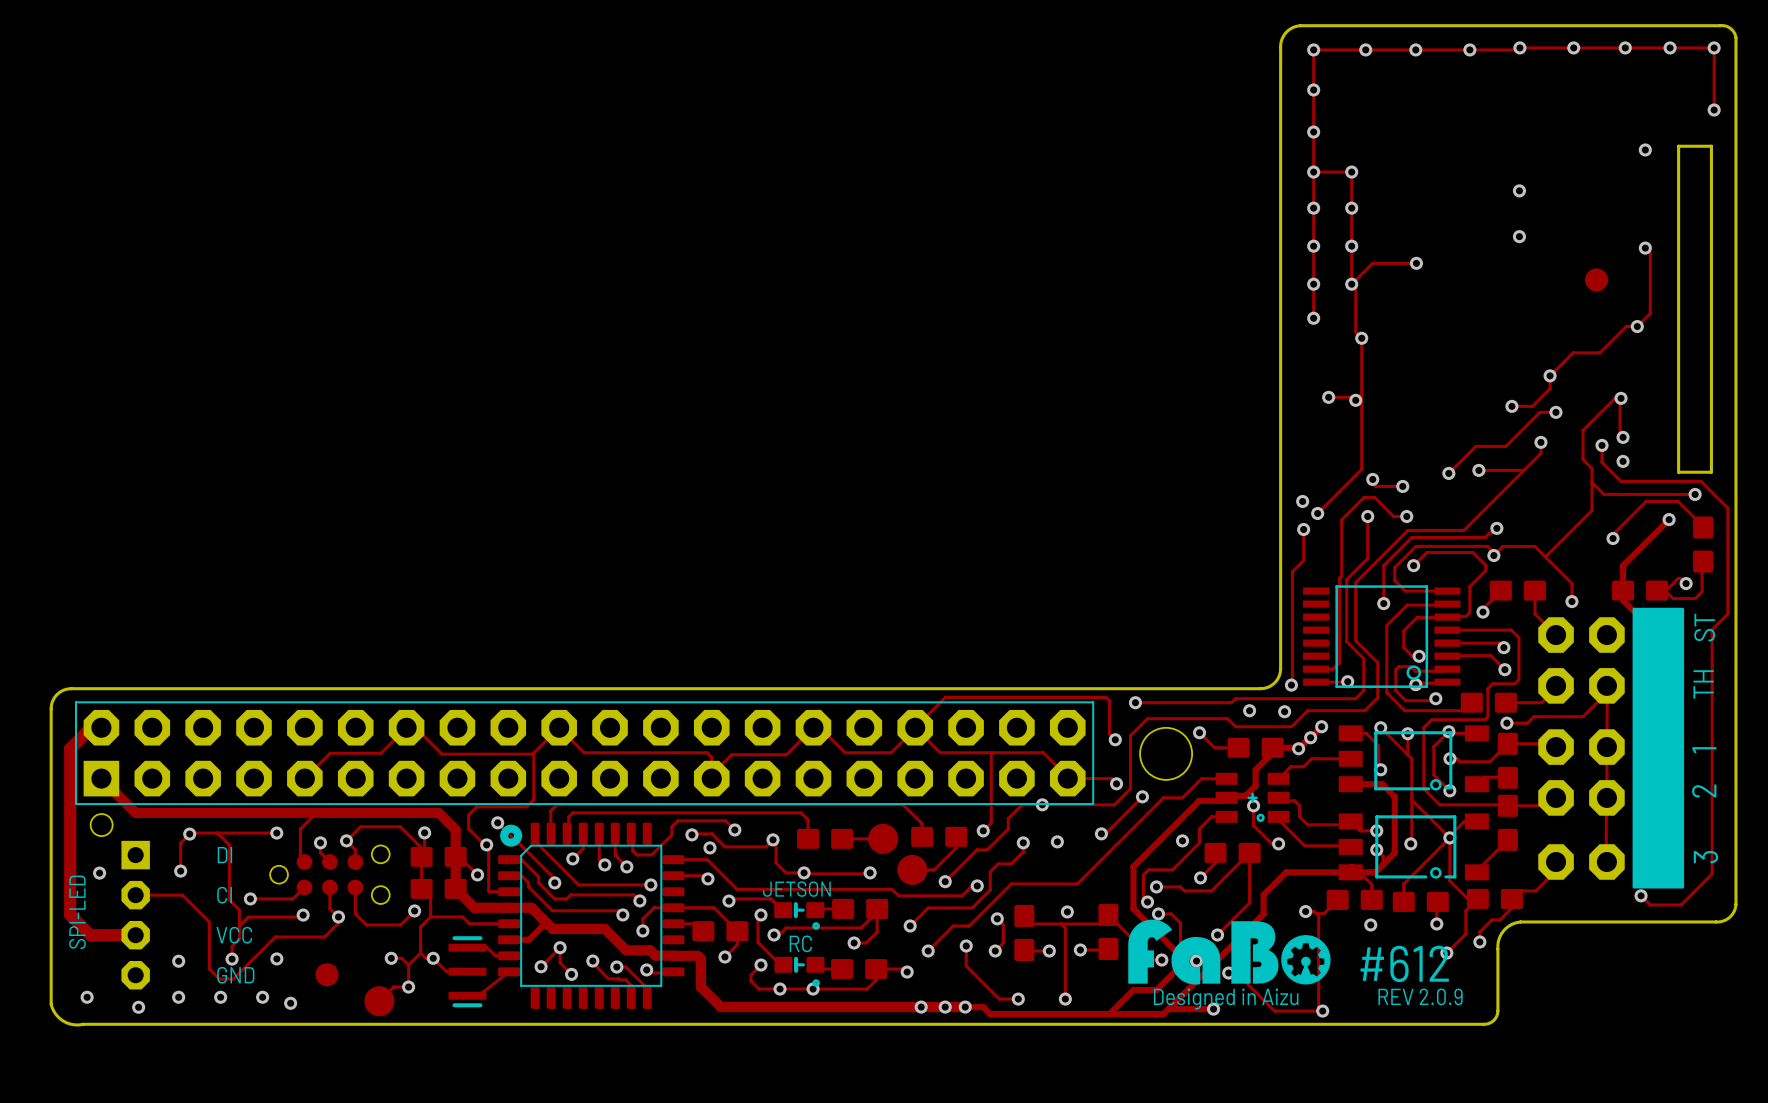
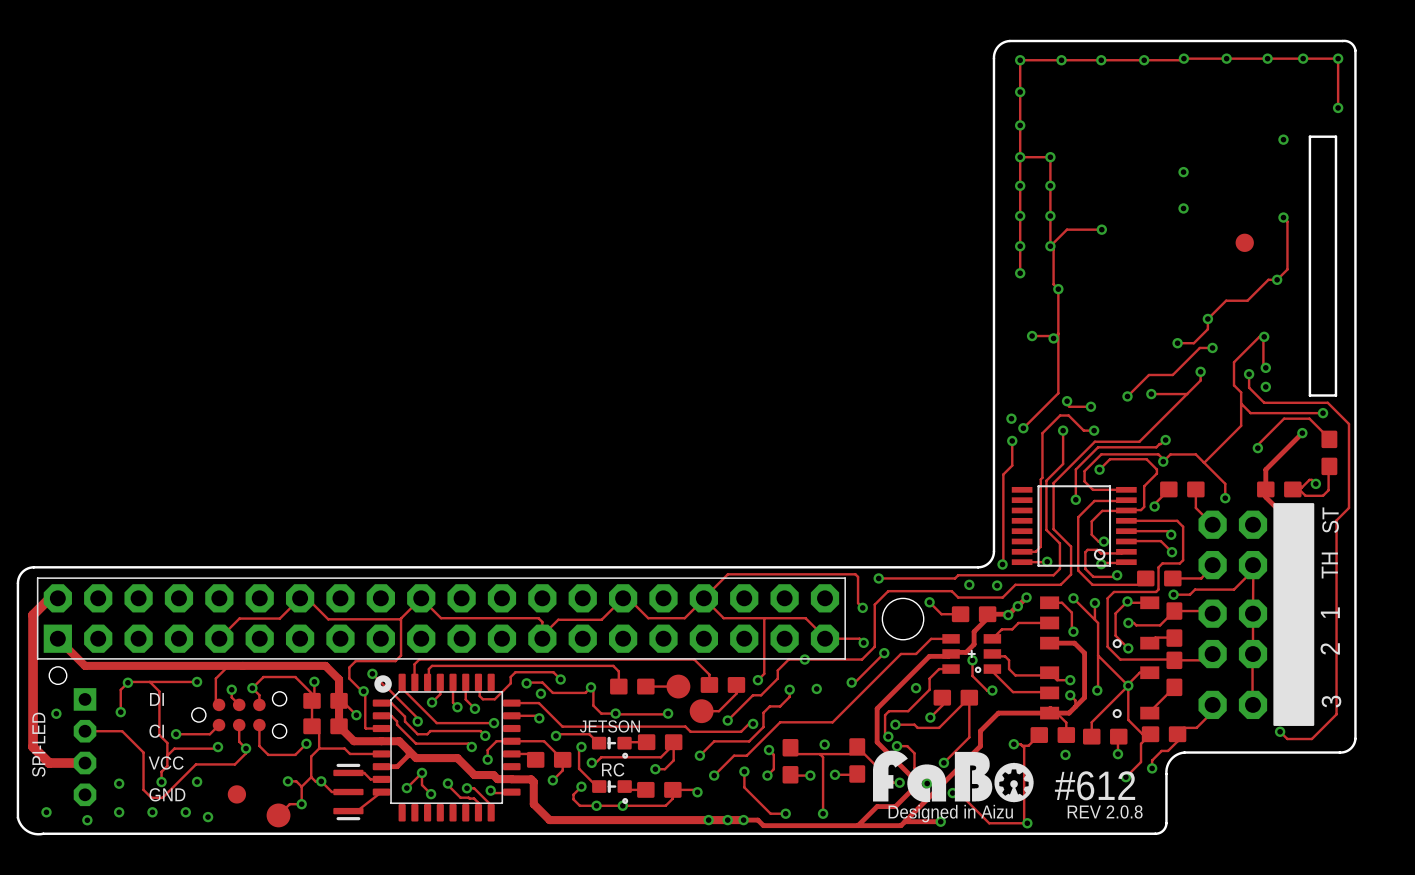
line: (1445, 787) (1450, 787) (1450, 732) (1375, 732) (1375, 788) (1428, 788) -> none
line: (1425, 876) (1376, 876) (1376, 816) (1454, 816) (1454, 876) (1445, 876) -> none
text: REV 2.0.9 (1420, 996) -> REV 2.0.8 (1105, 811)

